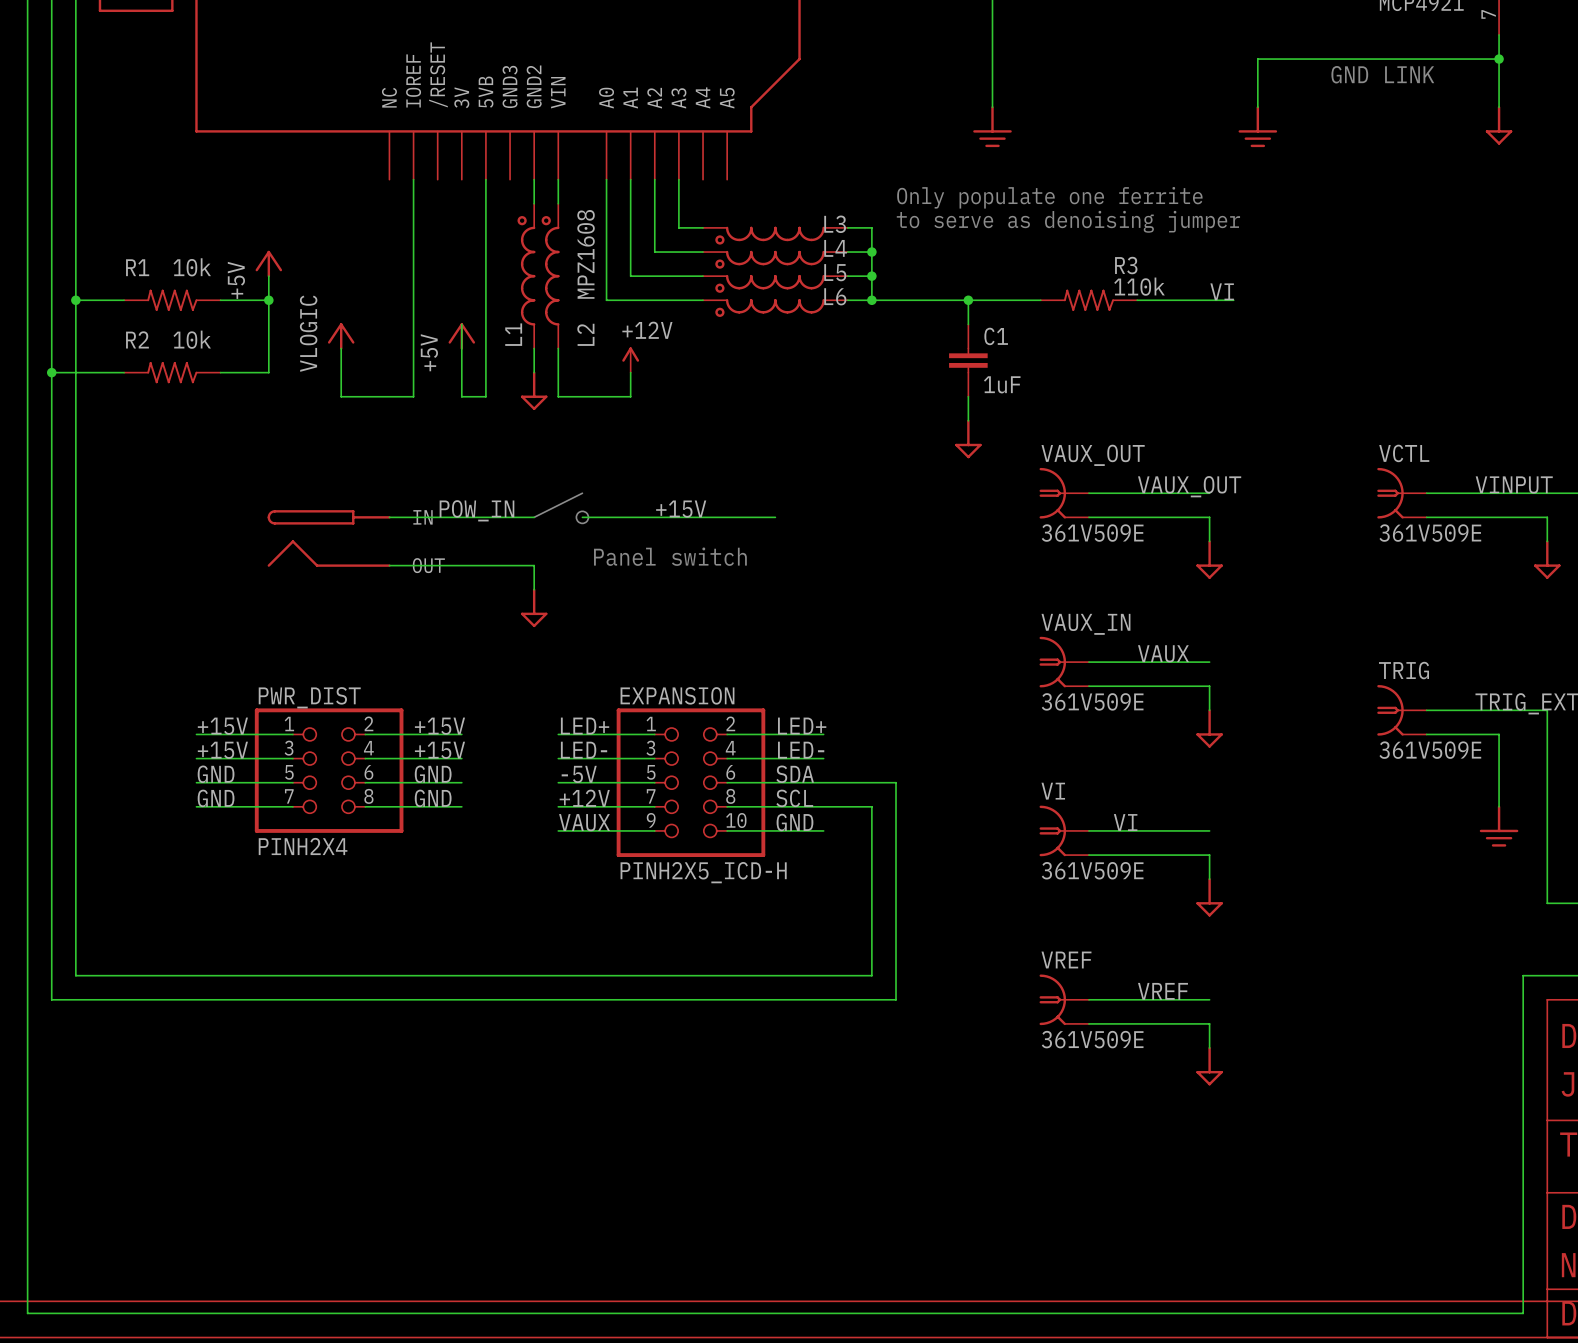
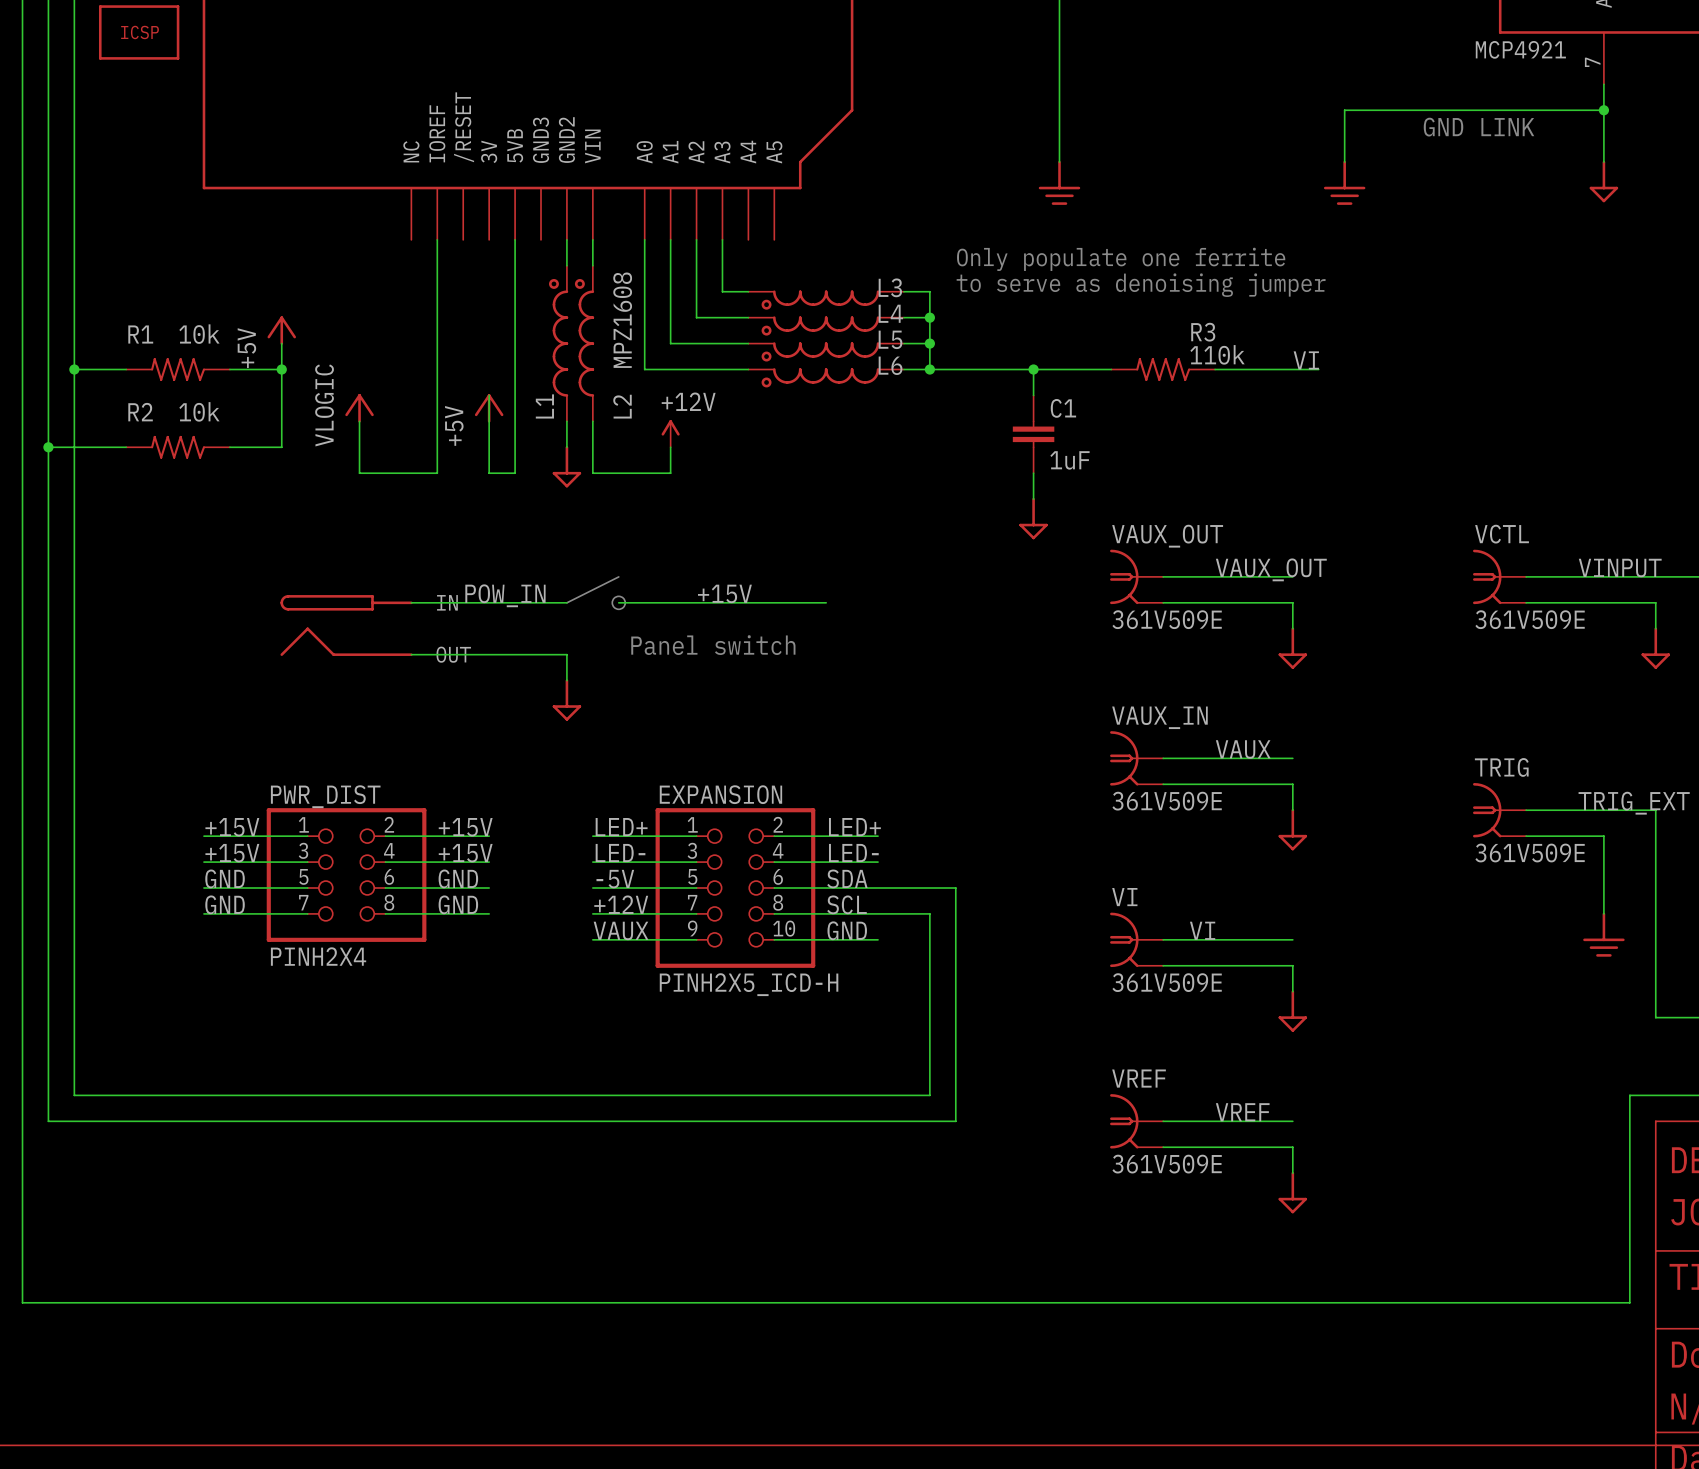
wire: (27, 1168) (27, 1313) (1523, 1313) (1523, 1168) -> (22, 1302) (1629, 1302)

